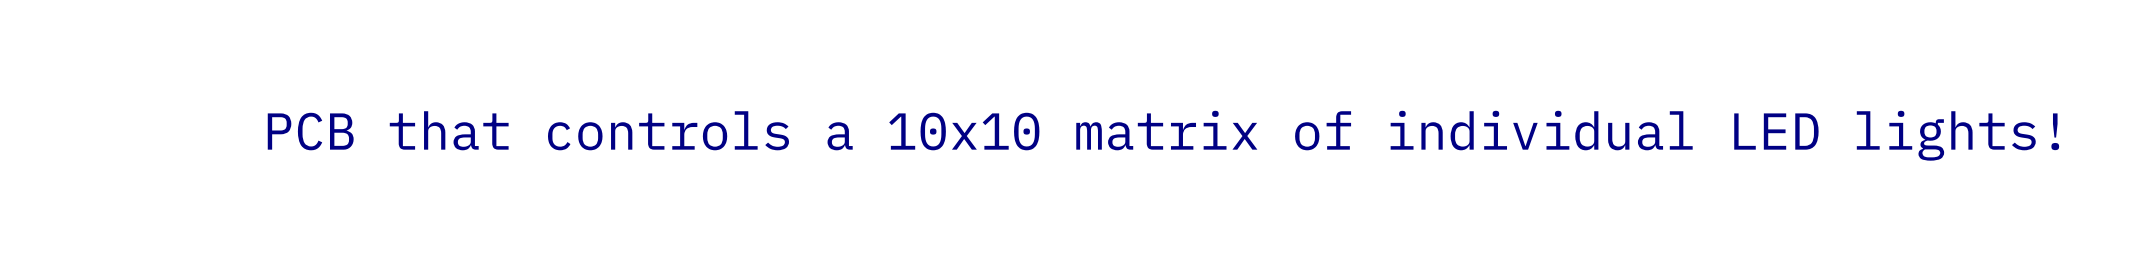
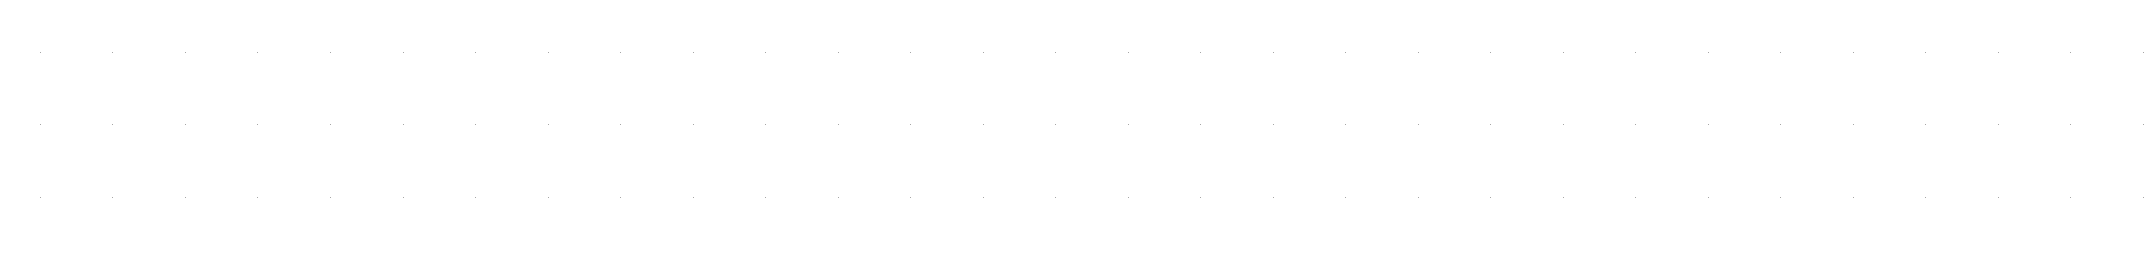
text: PCB that controls a 10x10 matrix of individual LED lights! (1163, 135) -> none

